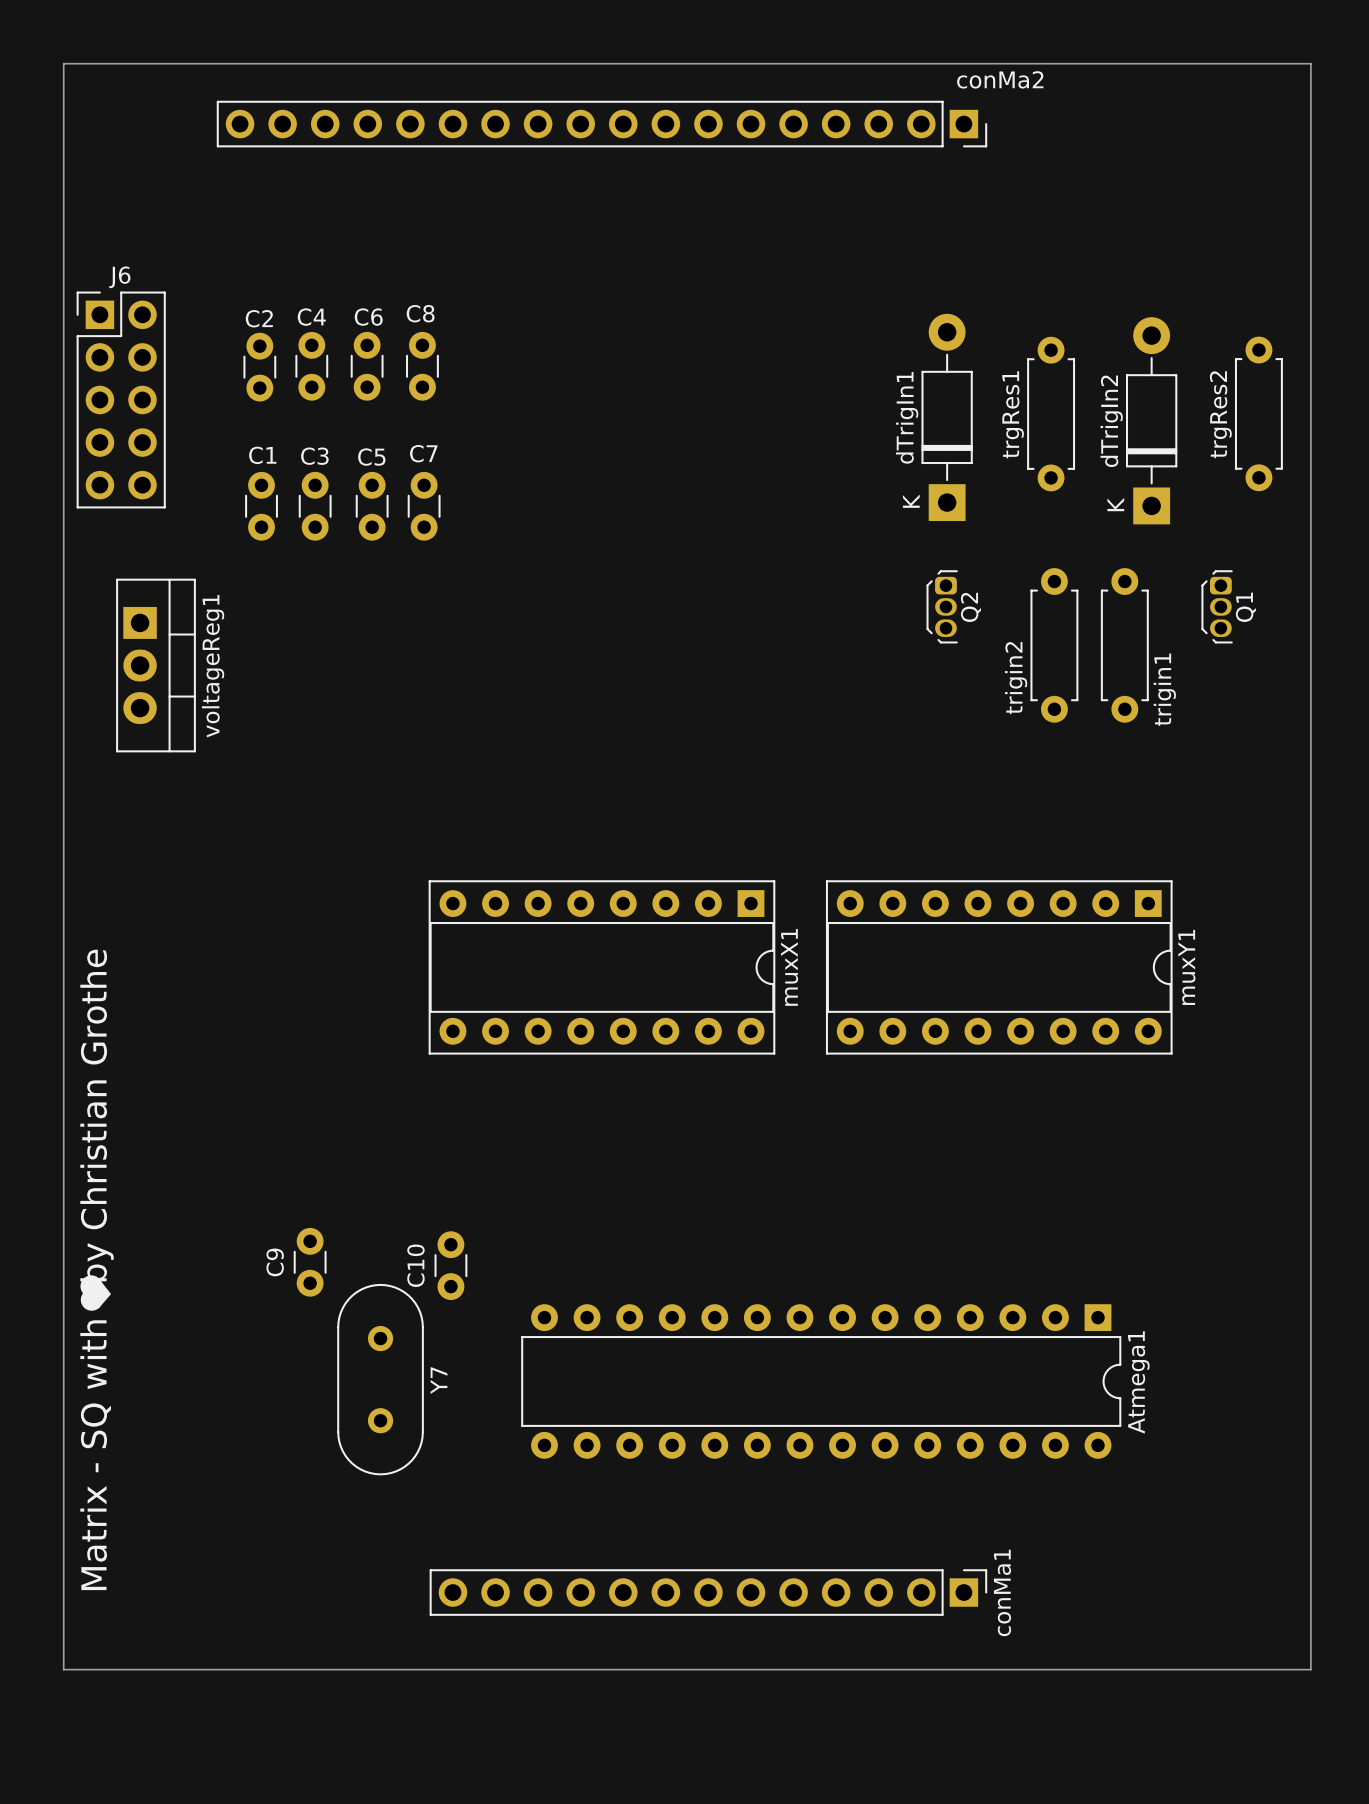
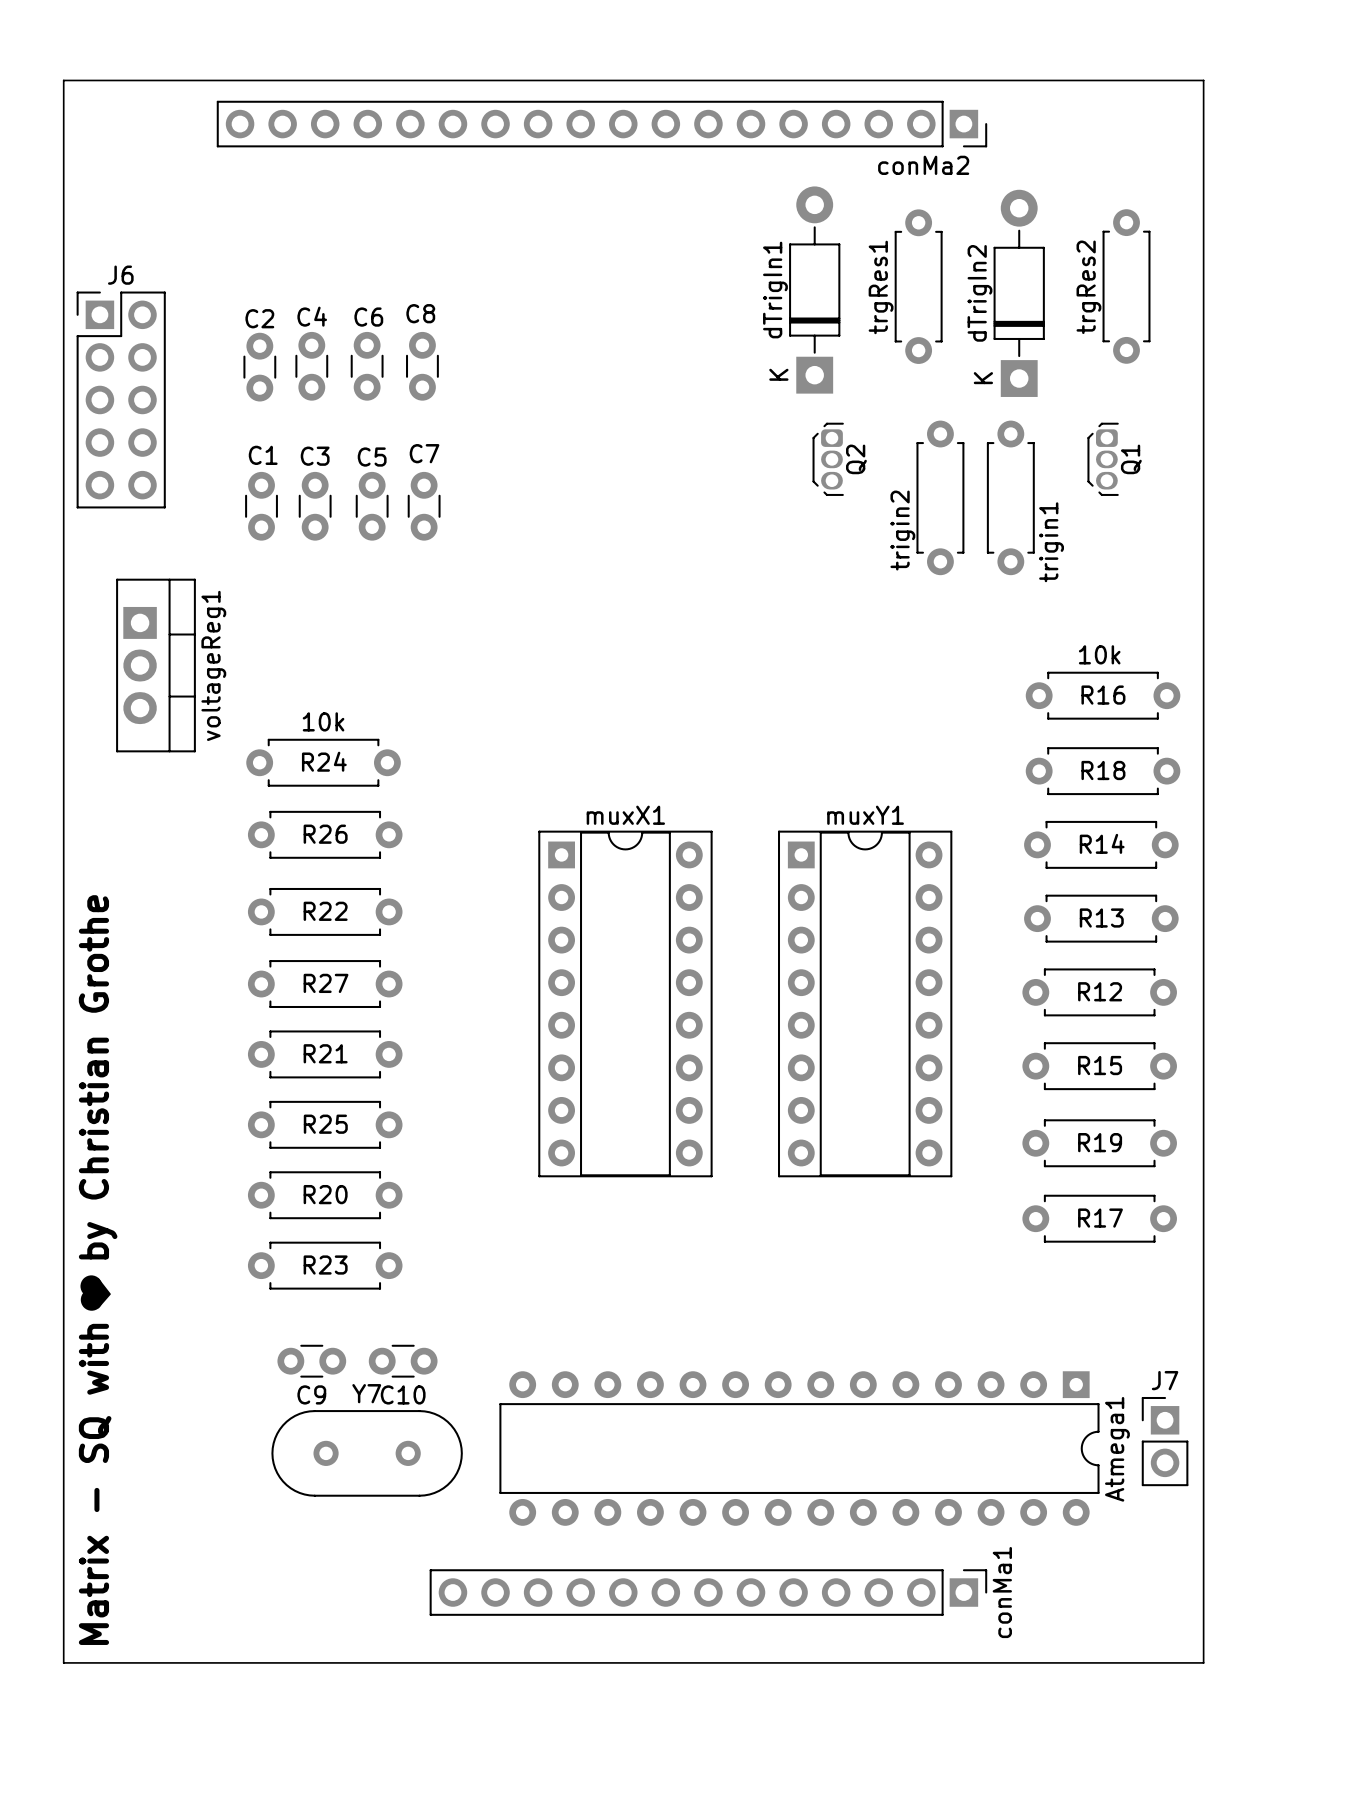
conMa2 name position: conMa2 (1000, 79) -> conMa2 (923, 165)
board edge: (63, 80) (63, 63) (1310, 63) (1310, 1669) (63, 1669) (63, 1662) -> (63, 80) (1203, 80) (1203, 1662) (63, 1662)
trgRes2 position: (1258, 413) -> (1126, 286)
trgRes1 position: (1051, 414) -> (918, 286)
dTrigIn1 position: (947, 417) -> (814, 290)
dTrigIn2 position: (1151, 420) -> (1019, 293)
Q2 position: (942, 606) -> (828, 459)
Q1 position: (1217, 606) -> (1103, 459)
trigin2 position: (1054, 645) -> (940, 497)
trigin1 position: (1124, 645) -> (1010, 497)
text: none -> 10k (1099, 654)
R16: none -> (1103, 695)
text: none -> 10k (323, 721)
R24: none -> (323, 762)
R18: none -> (1103, 771)
R26: none -> (325, 834)
R14: none -> (1101, 844)
R22: none -> (325, 911)
R13: none -> (1101, 918)
muxX1 rotation: 0° (601, 967) -> 90° counterclockwise (625, 1003)
muxY1 rotation: 0° (999, 967) -> 90° counterclockwise (865, 1003)
R27: none -> (325, 984)
R12: none -> (1099, 992)
R21: none -> (325, 1054)
R15: none -> (1099, 1066)
R25: none -> (325, 1124)
R19: none -> (1099, 1143)
R20: none -> (325, 1195)
R17: none -> (1099, 1218)
C9 name position: C9 (275, 1262) -> C9 (311, 1394)
C9 rotation: 0° (310, 1262) -> 90° clockwise (311, 1361)
C9 position: (310, 1262) -> (311, 1361)
R23: none -> (325, 1265)
C10 name position: C10 (415, 1265) -> C10 (403, 1394)
C10 rotation: 0° (450, 1265) -> 90° clockwise (403, 1361)
C10 position: (450, 1265) -> (403, 1361)
Y7 rotation: 0° (380, 1379) -> 90° clockwise (367, 1453)
Y7 name position: Y7 (439, 1380) -> Y7 (366, 1393)
Atmega1 position: (821, 1381) -> (799, 1448)
J7: none -> (1165, 1441)

